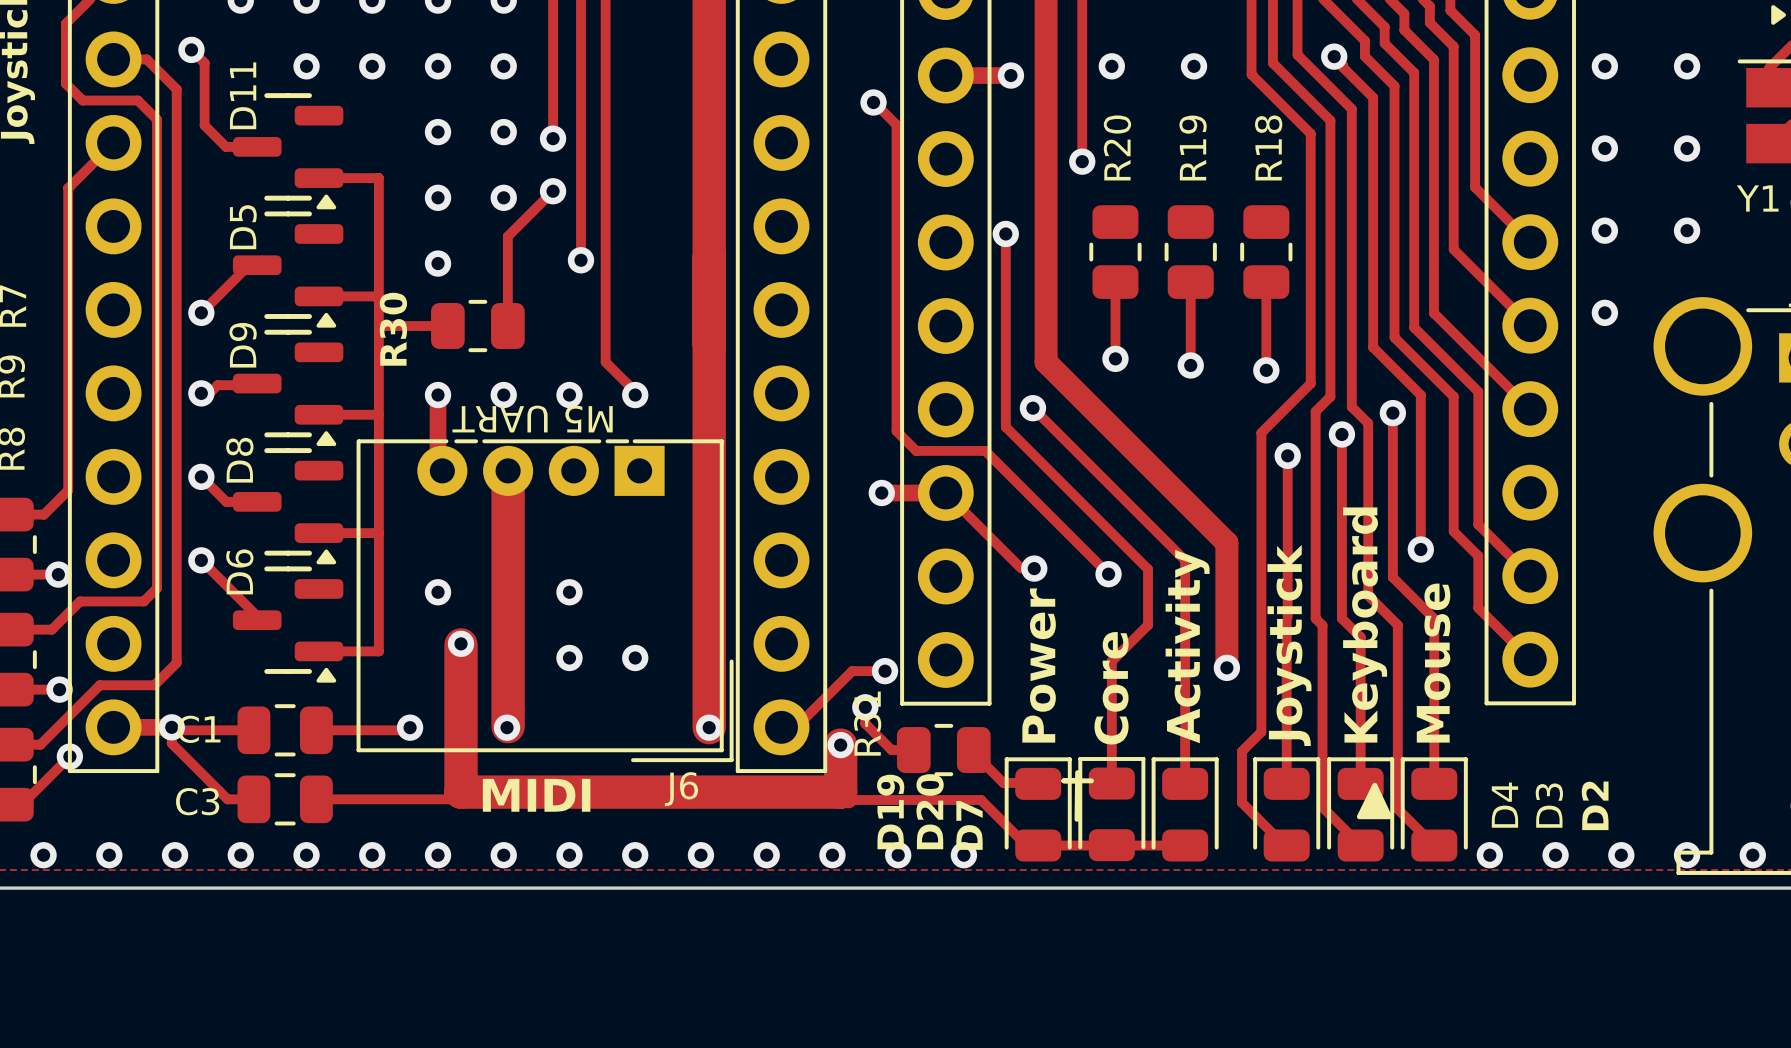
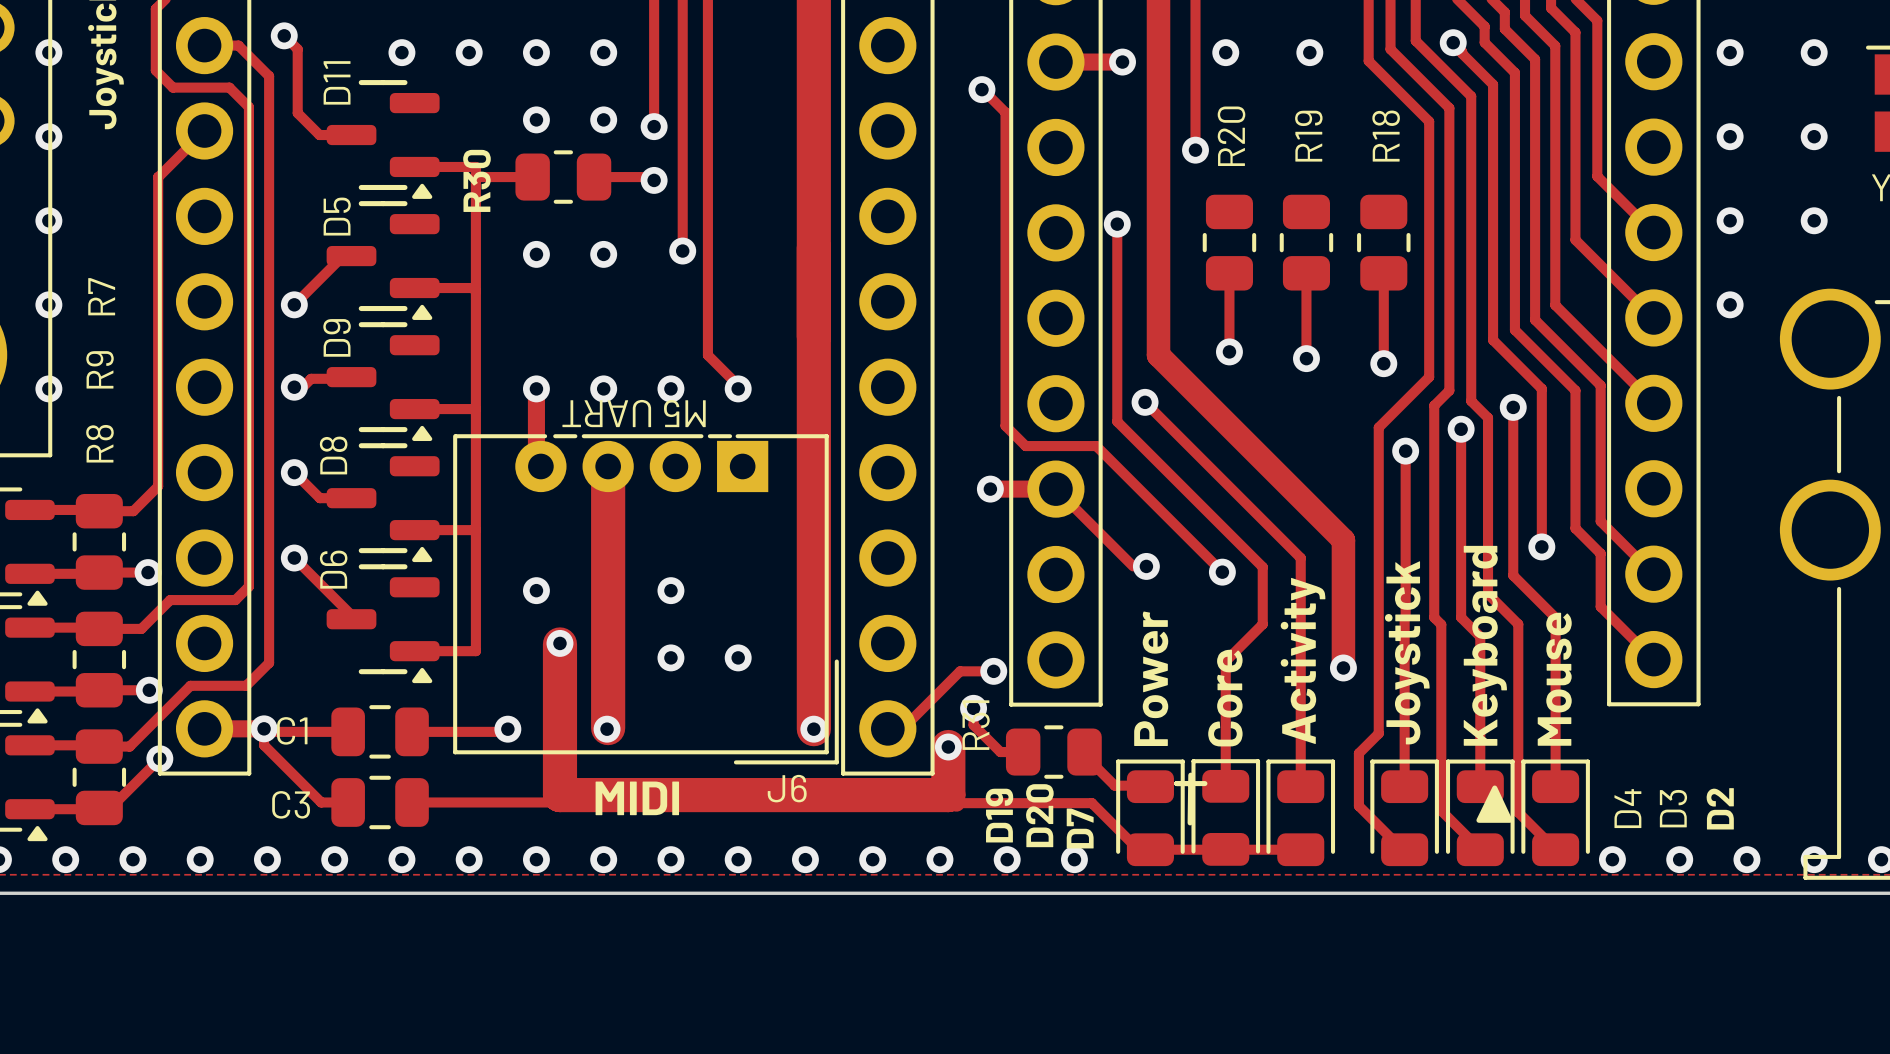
track: none -> (475, 177) (532, 177)
track: (553, 191) (507, 236) (507, 326) -> (654, 180) (650, 177) (594, 177)
via: (438, 197) -> none
via: (503, 197) -> none
via: none -> (603, 254)
track: (378, 326) (447, 326) -> none
R30 position: (477, 326) -> (563, 177)

